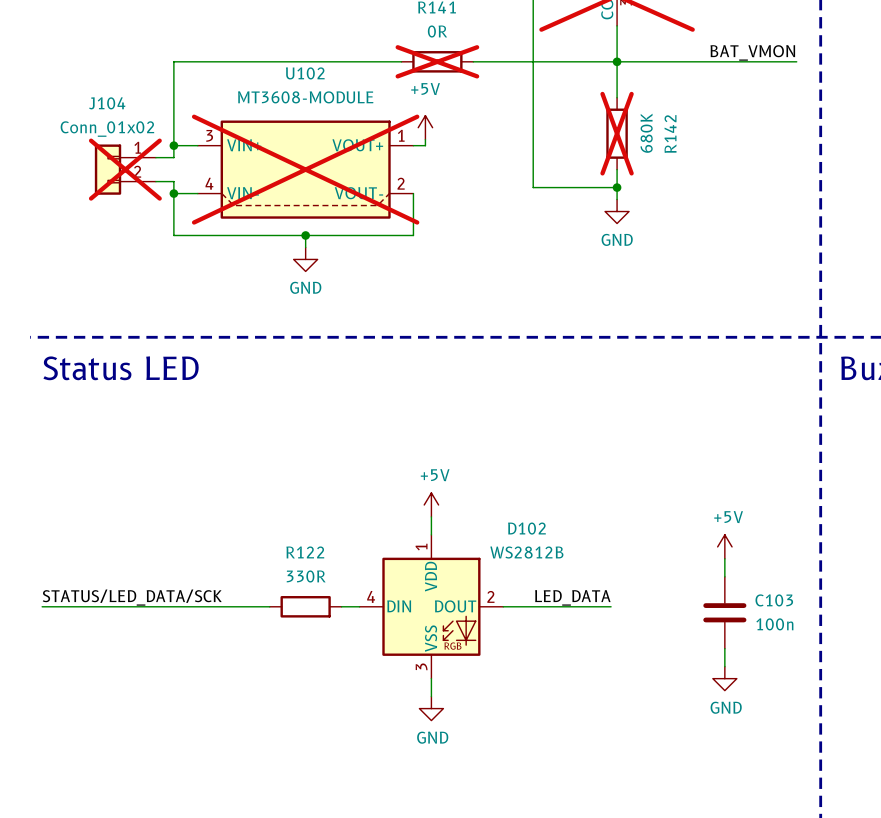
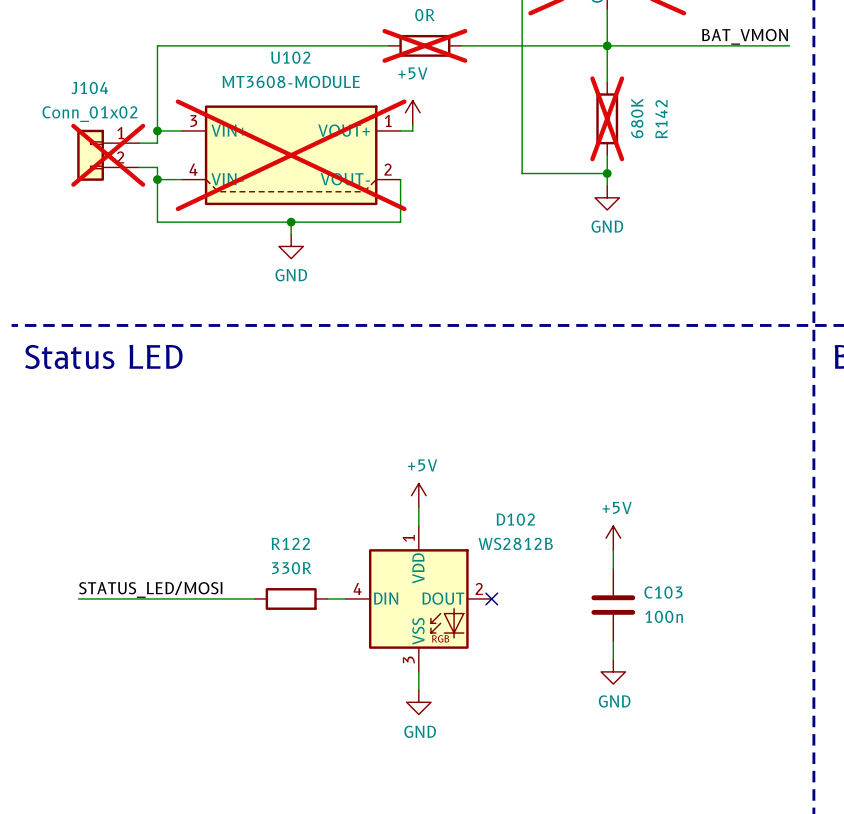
power symbol position: +5V (724, 546) -> +5V (613, 538)
wire: (724, 558) (724, 576) -> (613, 550) (613, 568)
label: STATUS/LED_DATA/SCK (132, 597) -> STATUS_LED/MOSI (150, 589)
label: LED_DATA (572, 597) -> none
wire: (42, 606) (96, 606) -> none
wire: (503, 606) (611, 606) -> none
no-connect mark: none -> (491, 598)
C103 position: (724, 612) -> (613, 605)
wire: (724, 648) (724, 666) -> (613, 641) (613, 659)
power symbol position: GND (724, 678) -> GND (613, 671)

